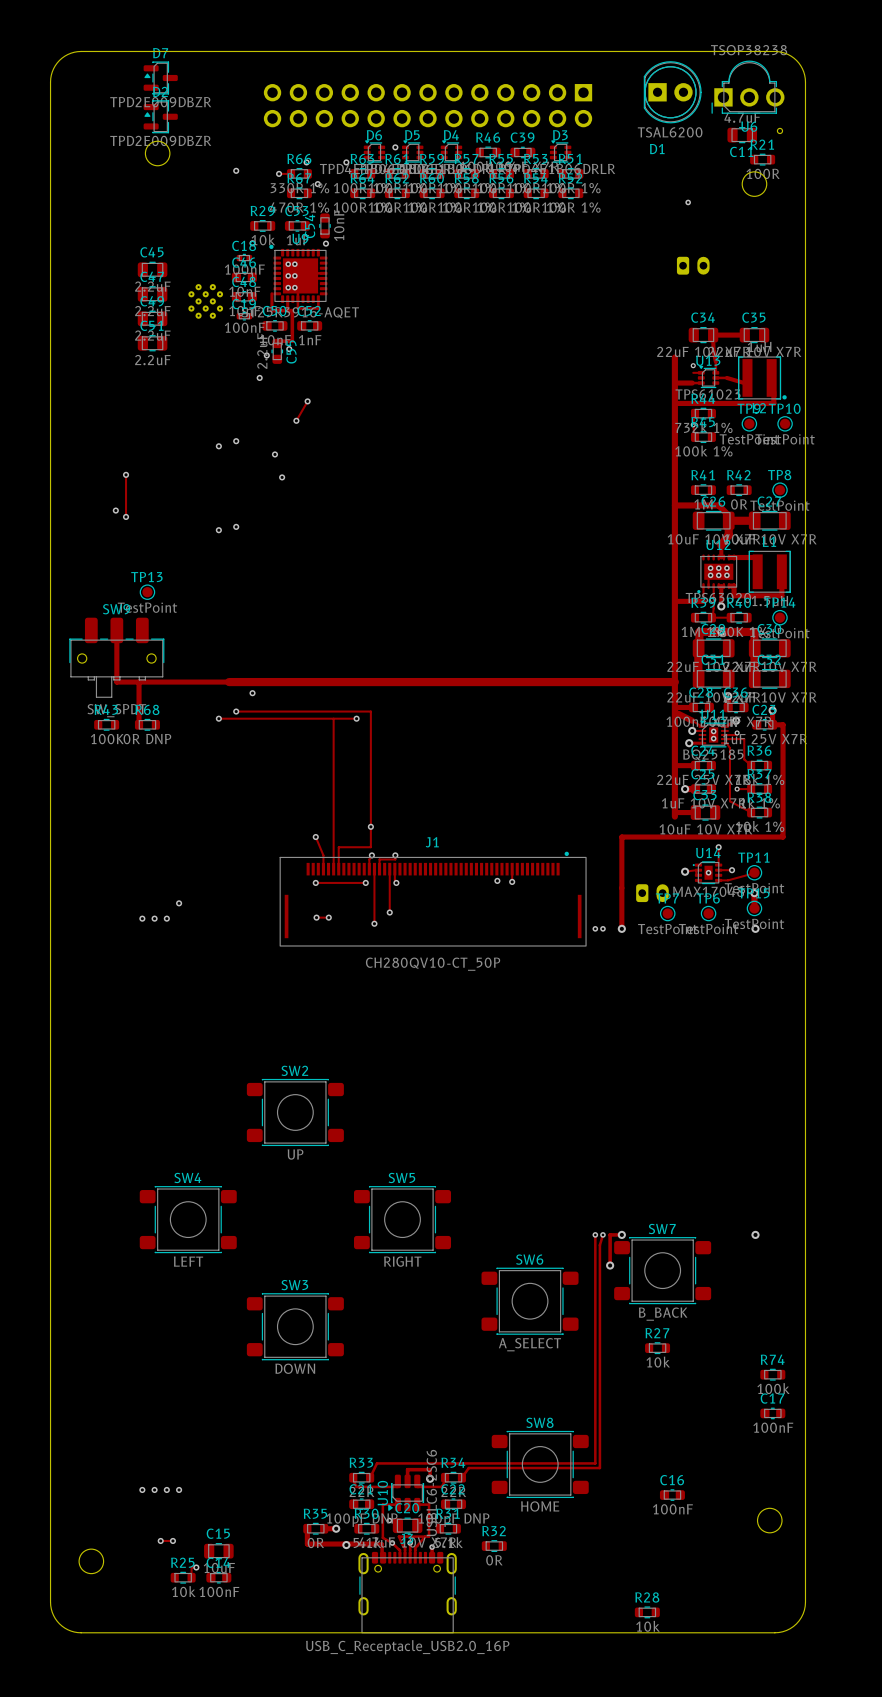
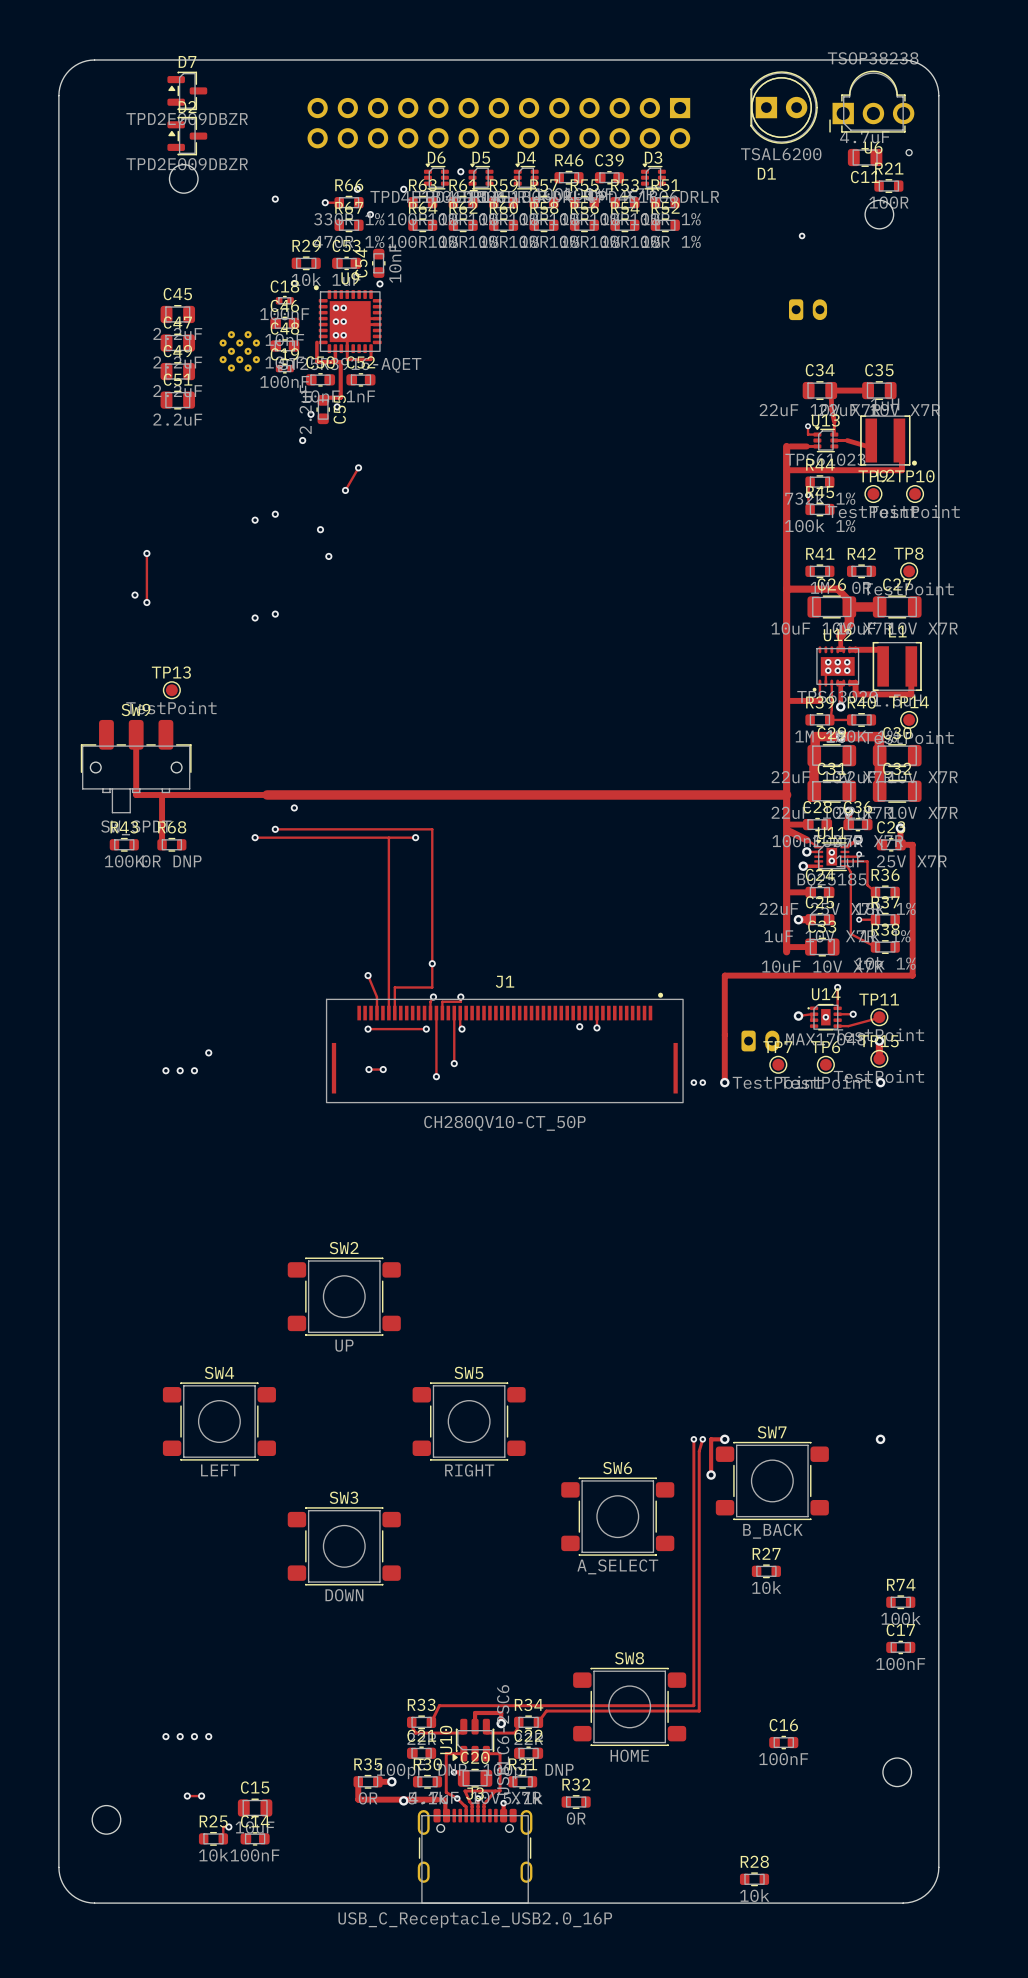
track: (674, 357) (674, 383) -> none
track: none -> (808, 426) (808, 434)

